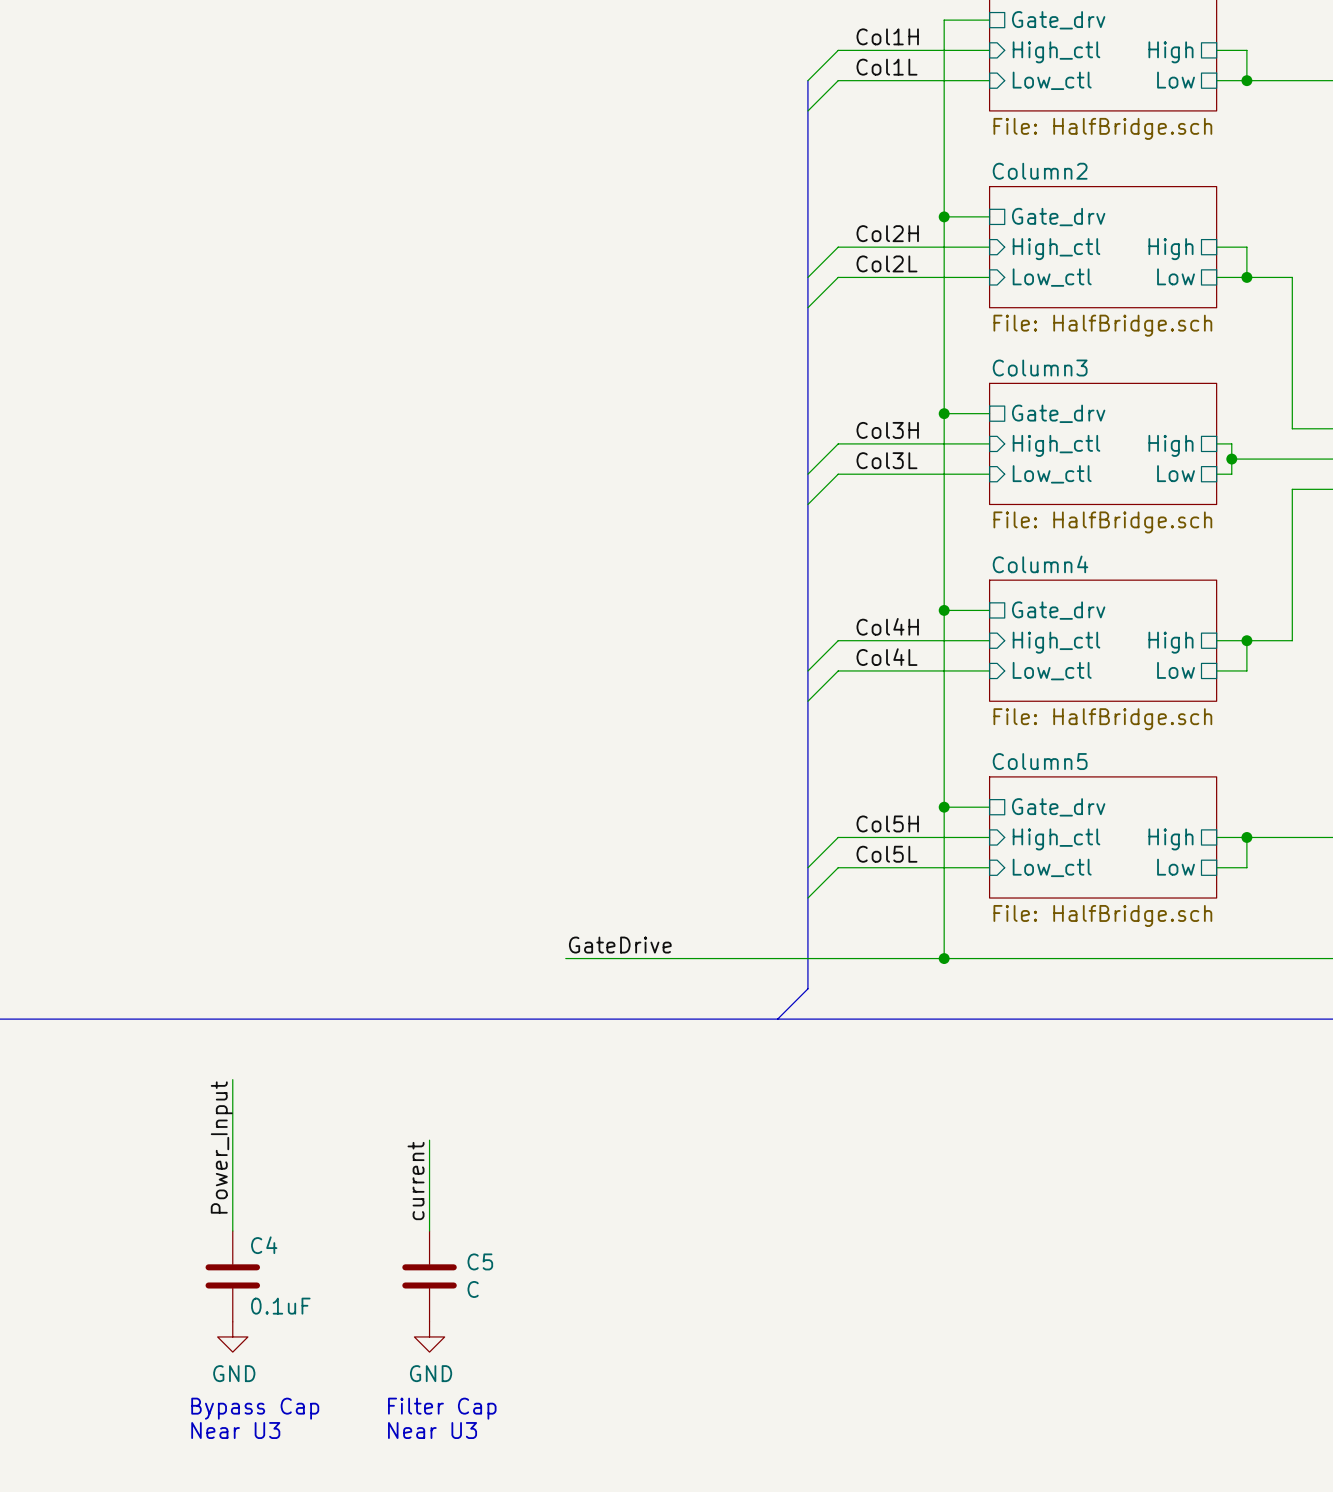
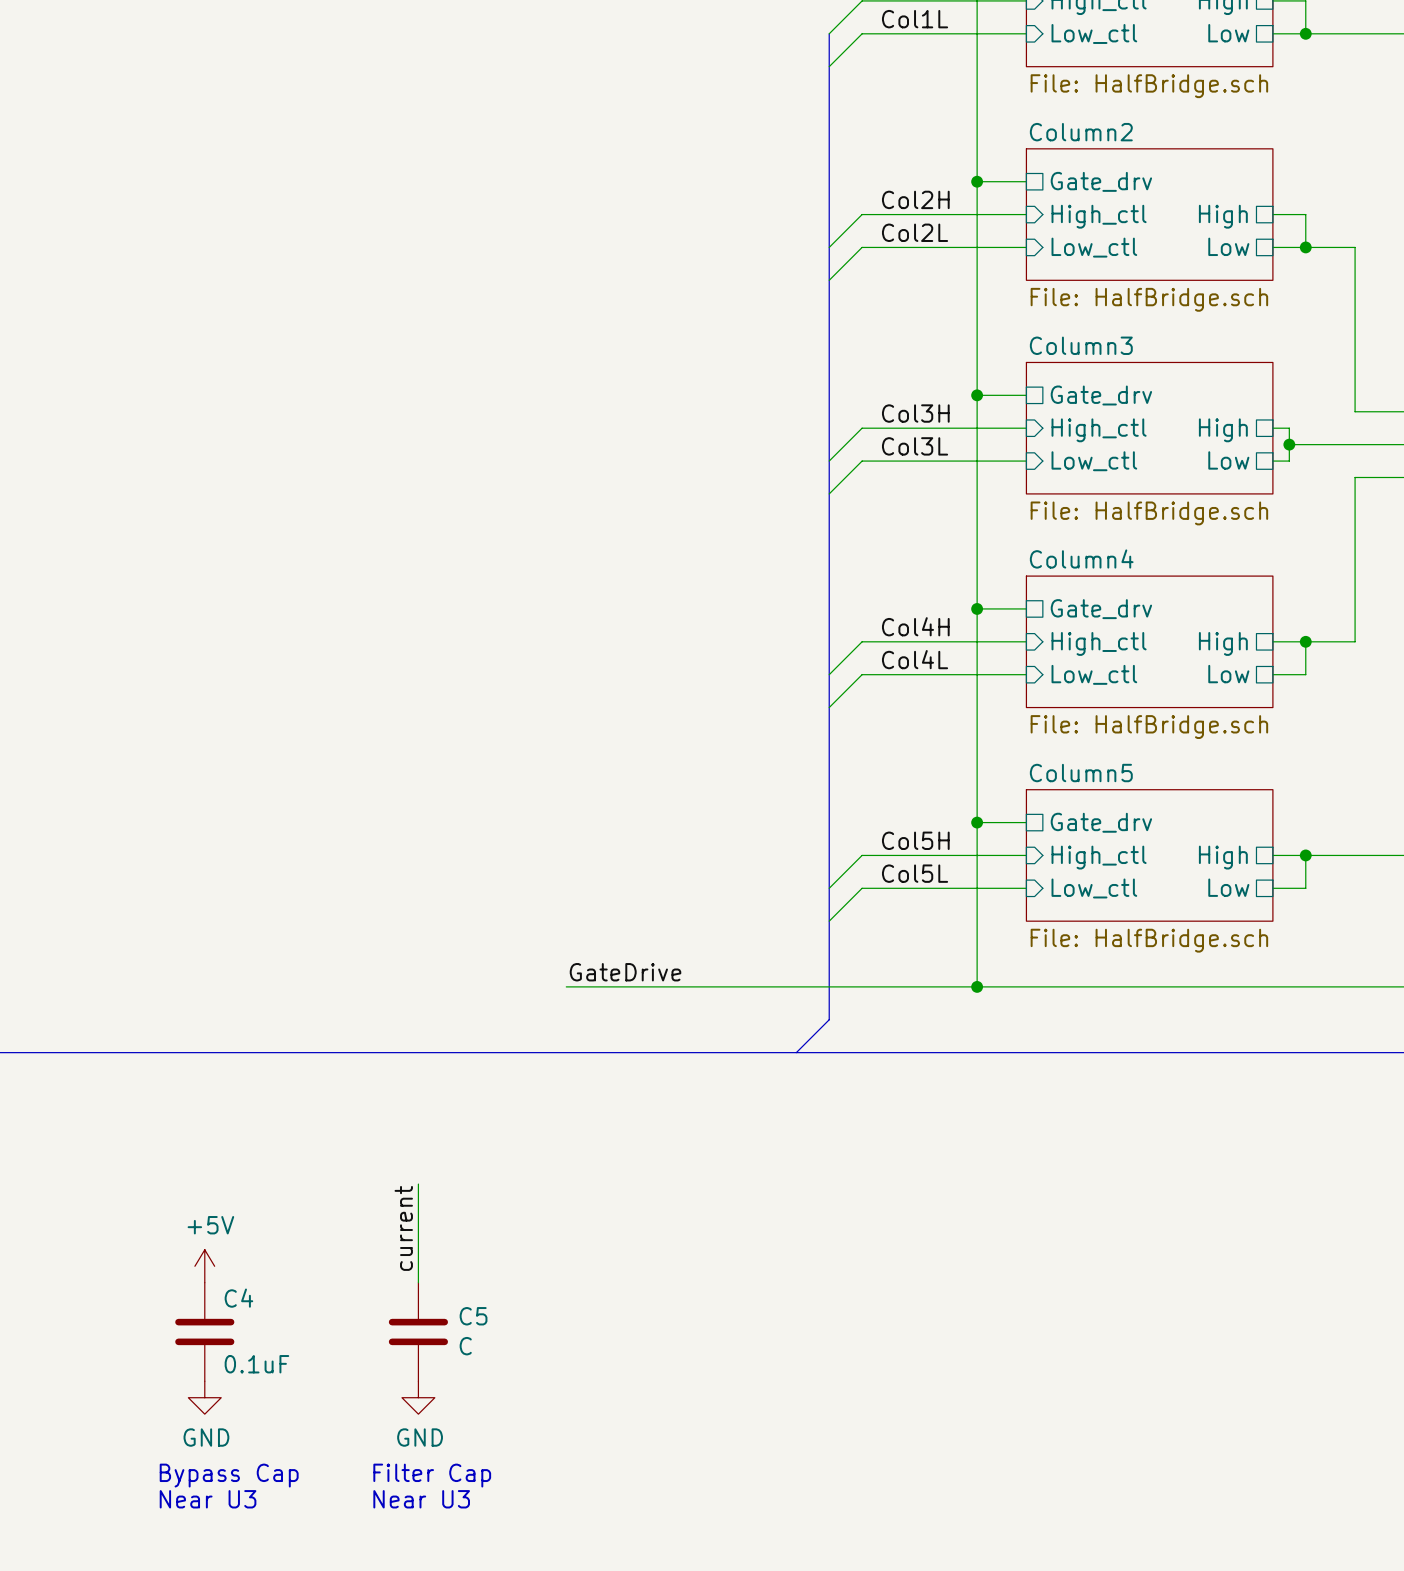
wire: (232, 1079) (232, 1231) -> none
label: Power_Input (221, 1147) -> none
power symbol: none -> +5V (204, 1266)

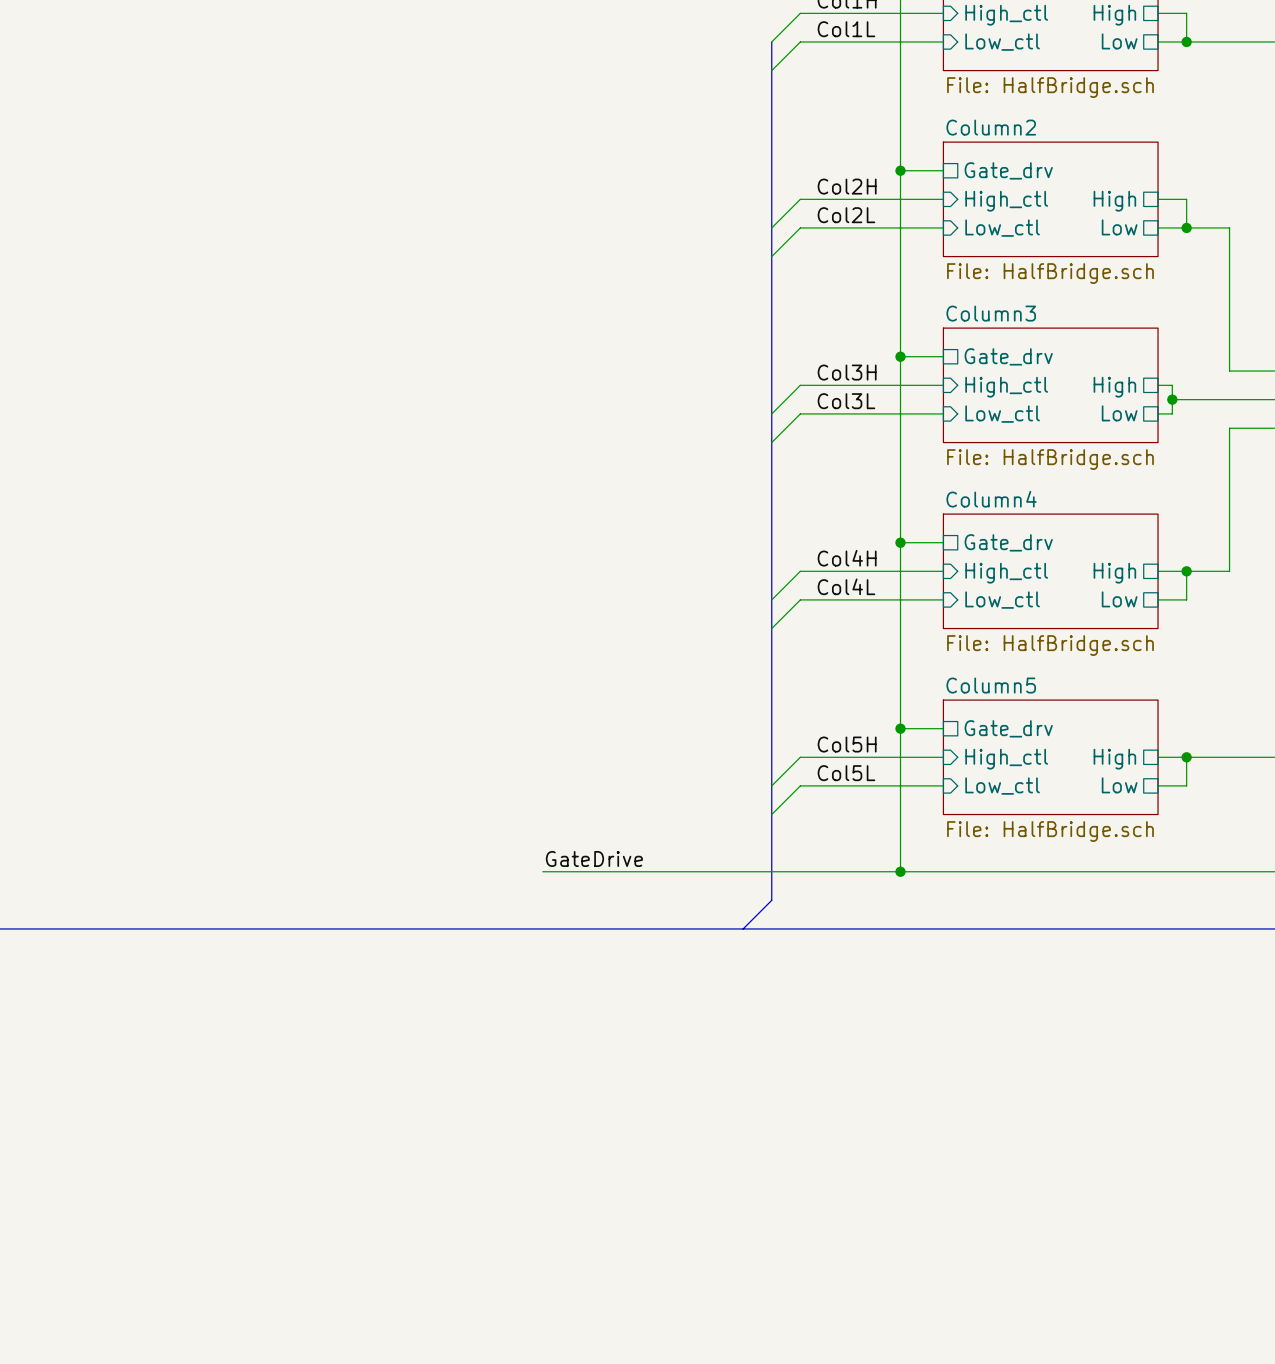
wire: (418, 1184) (418, 1282) -> none
label: current (403, 1228) -> none
power symbol: +5V (204, 1266) -> none
C4: 0.1uF (204, 1331) -> none
C5: C (418, 1331) -> none
power symbol: GND (204, 1397) -> none
power symbol: GND (418, 1397) -> none
text: Bypass Cap (229, 1475) -> none
text: Filter Cap (432, 1475) -> none
text: Near U3 (208, 1499) -> none
text: Near U3 (421, 1499) -> none

